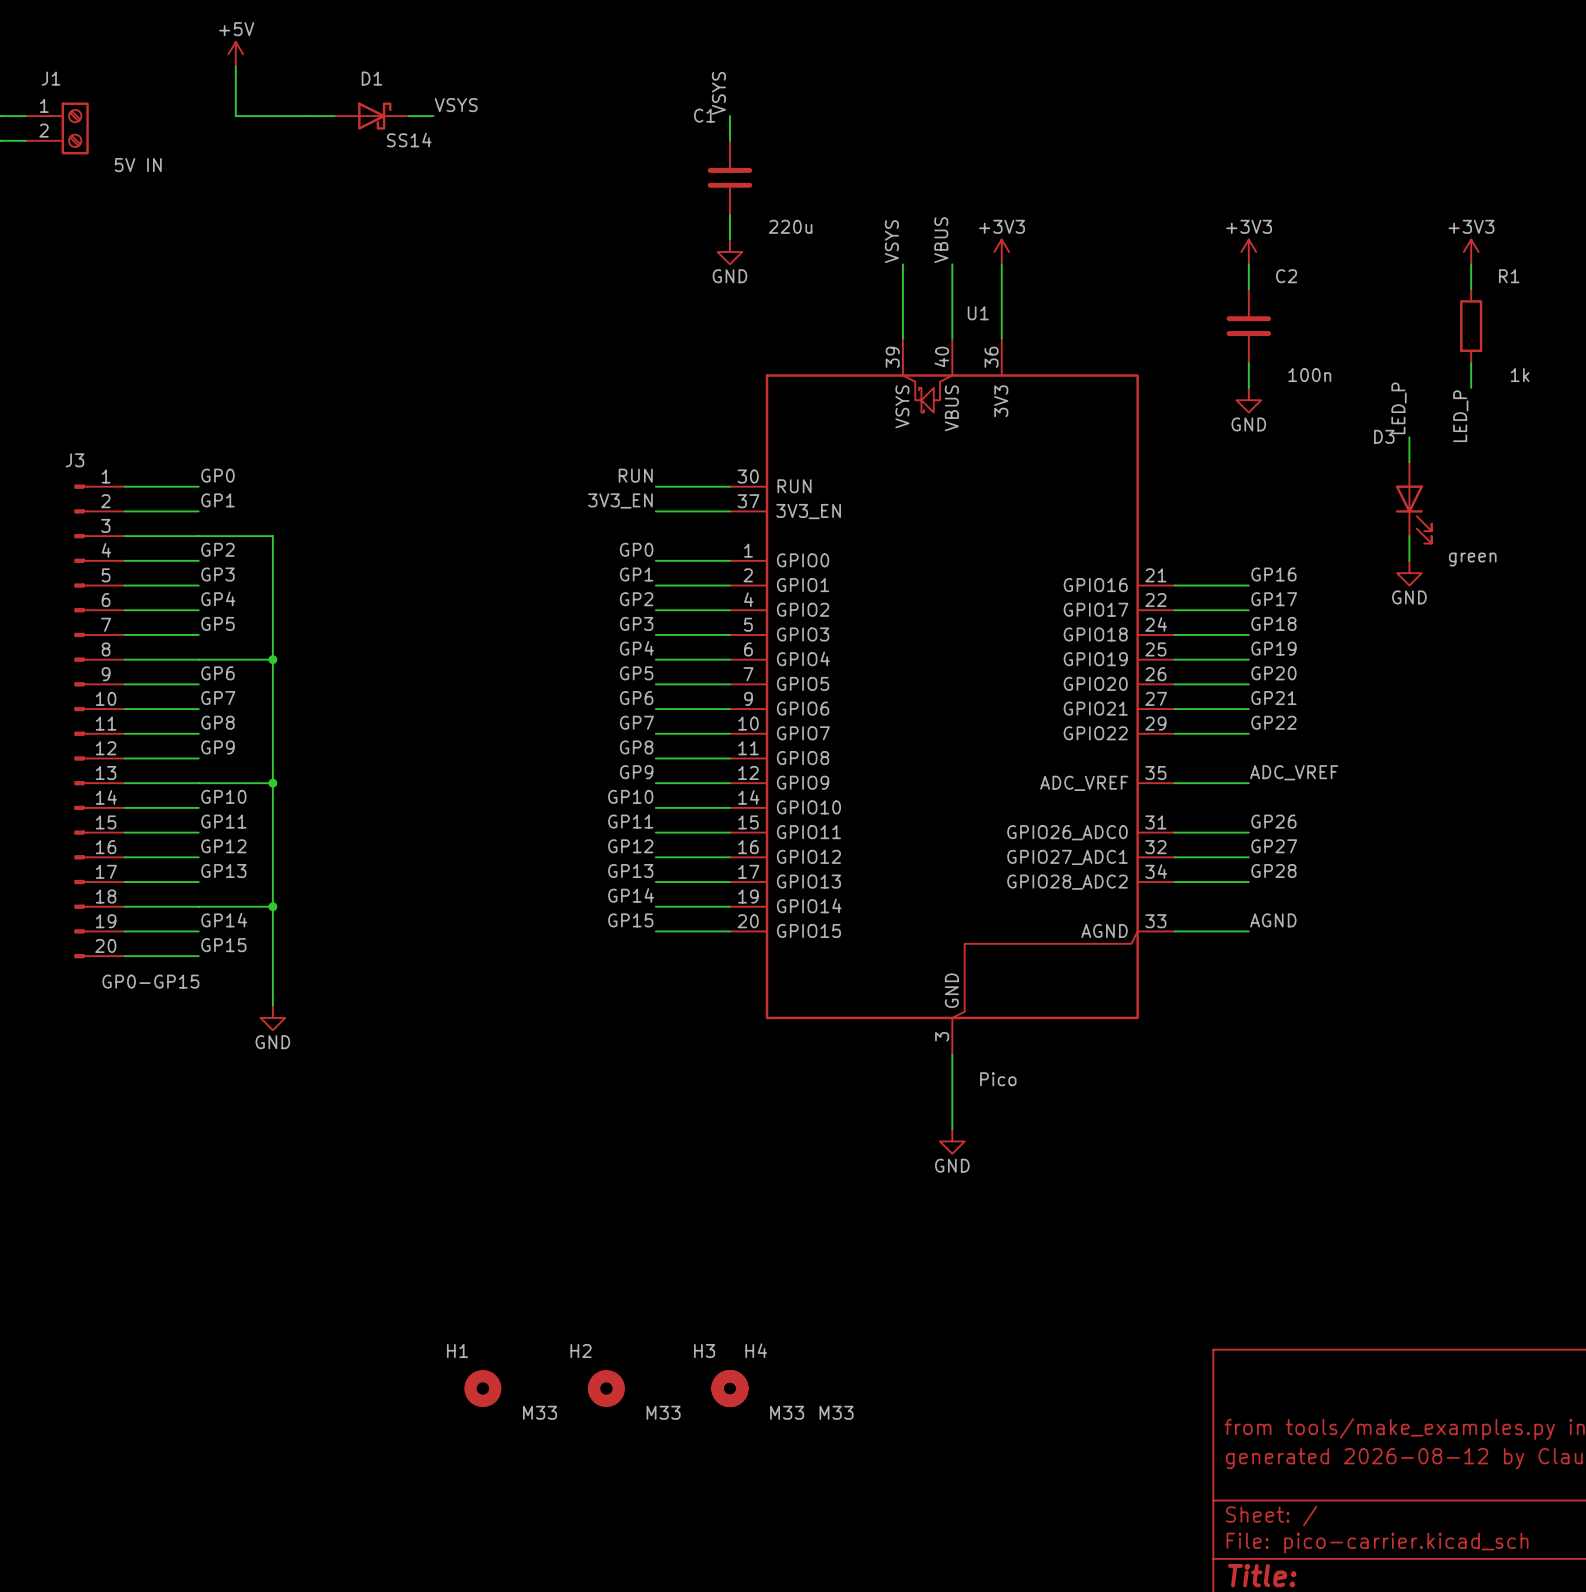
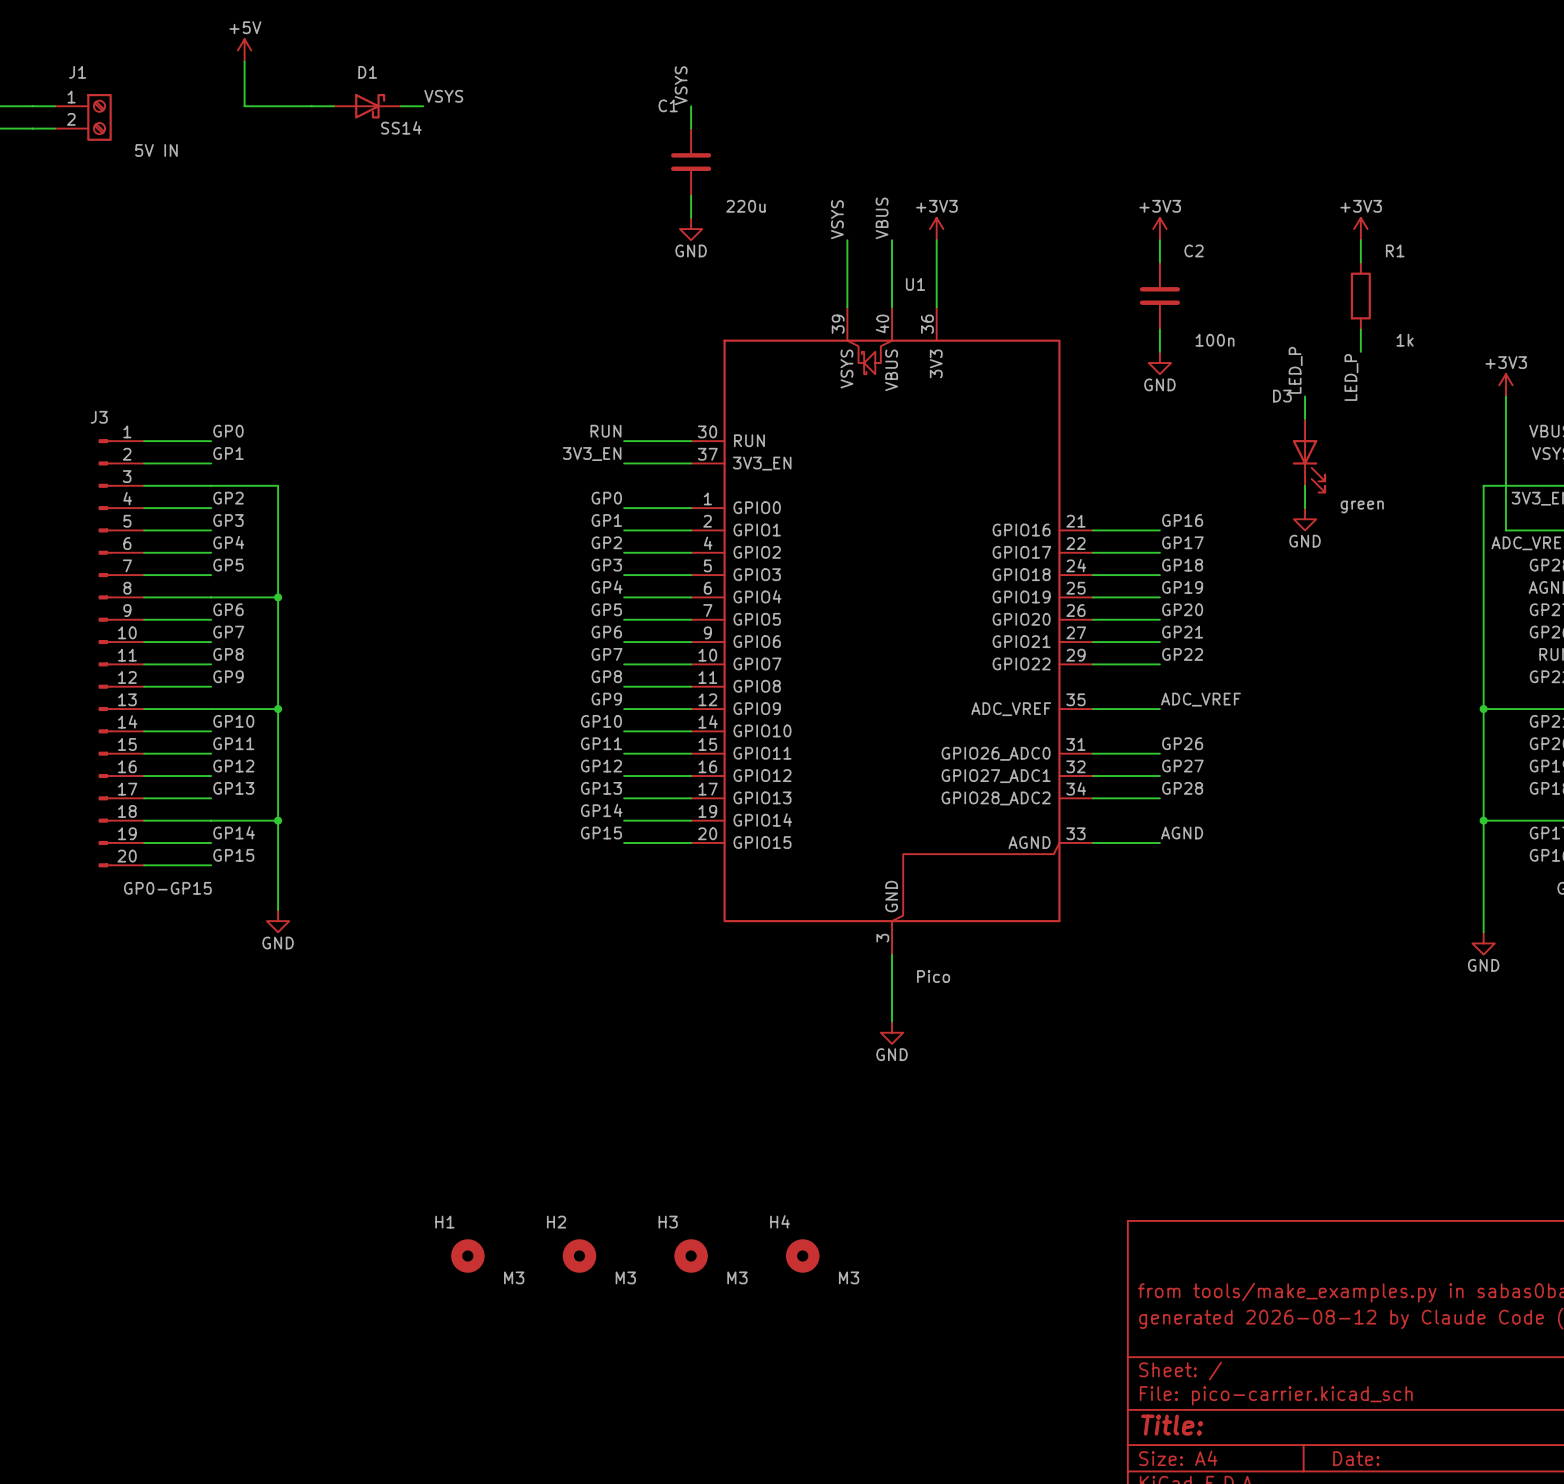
H4 name position: H4 (756, 1350) -> H4 (780, 1221)
H4 position: (729, 1388) -> (802, 1256)
H1 value: M33 (540, 1412) -> M3 (514, 1277)
H2 value: M33 (663, 1412) -> M3 (625, 1277)
H3 value: M33 (787, 1412) -> M3 (737, 1277)
H4 value: M33 (836, 1412) -> M3 (849, 1277)

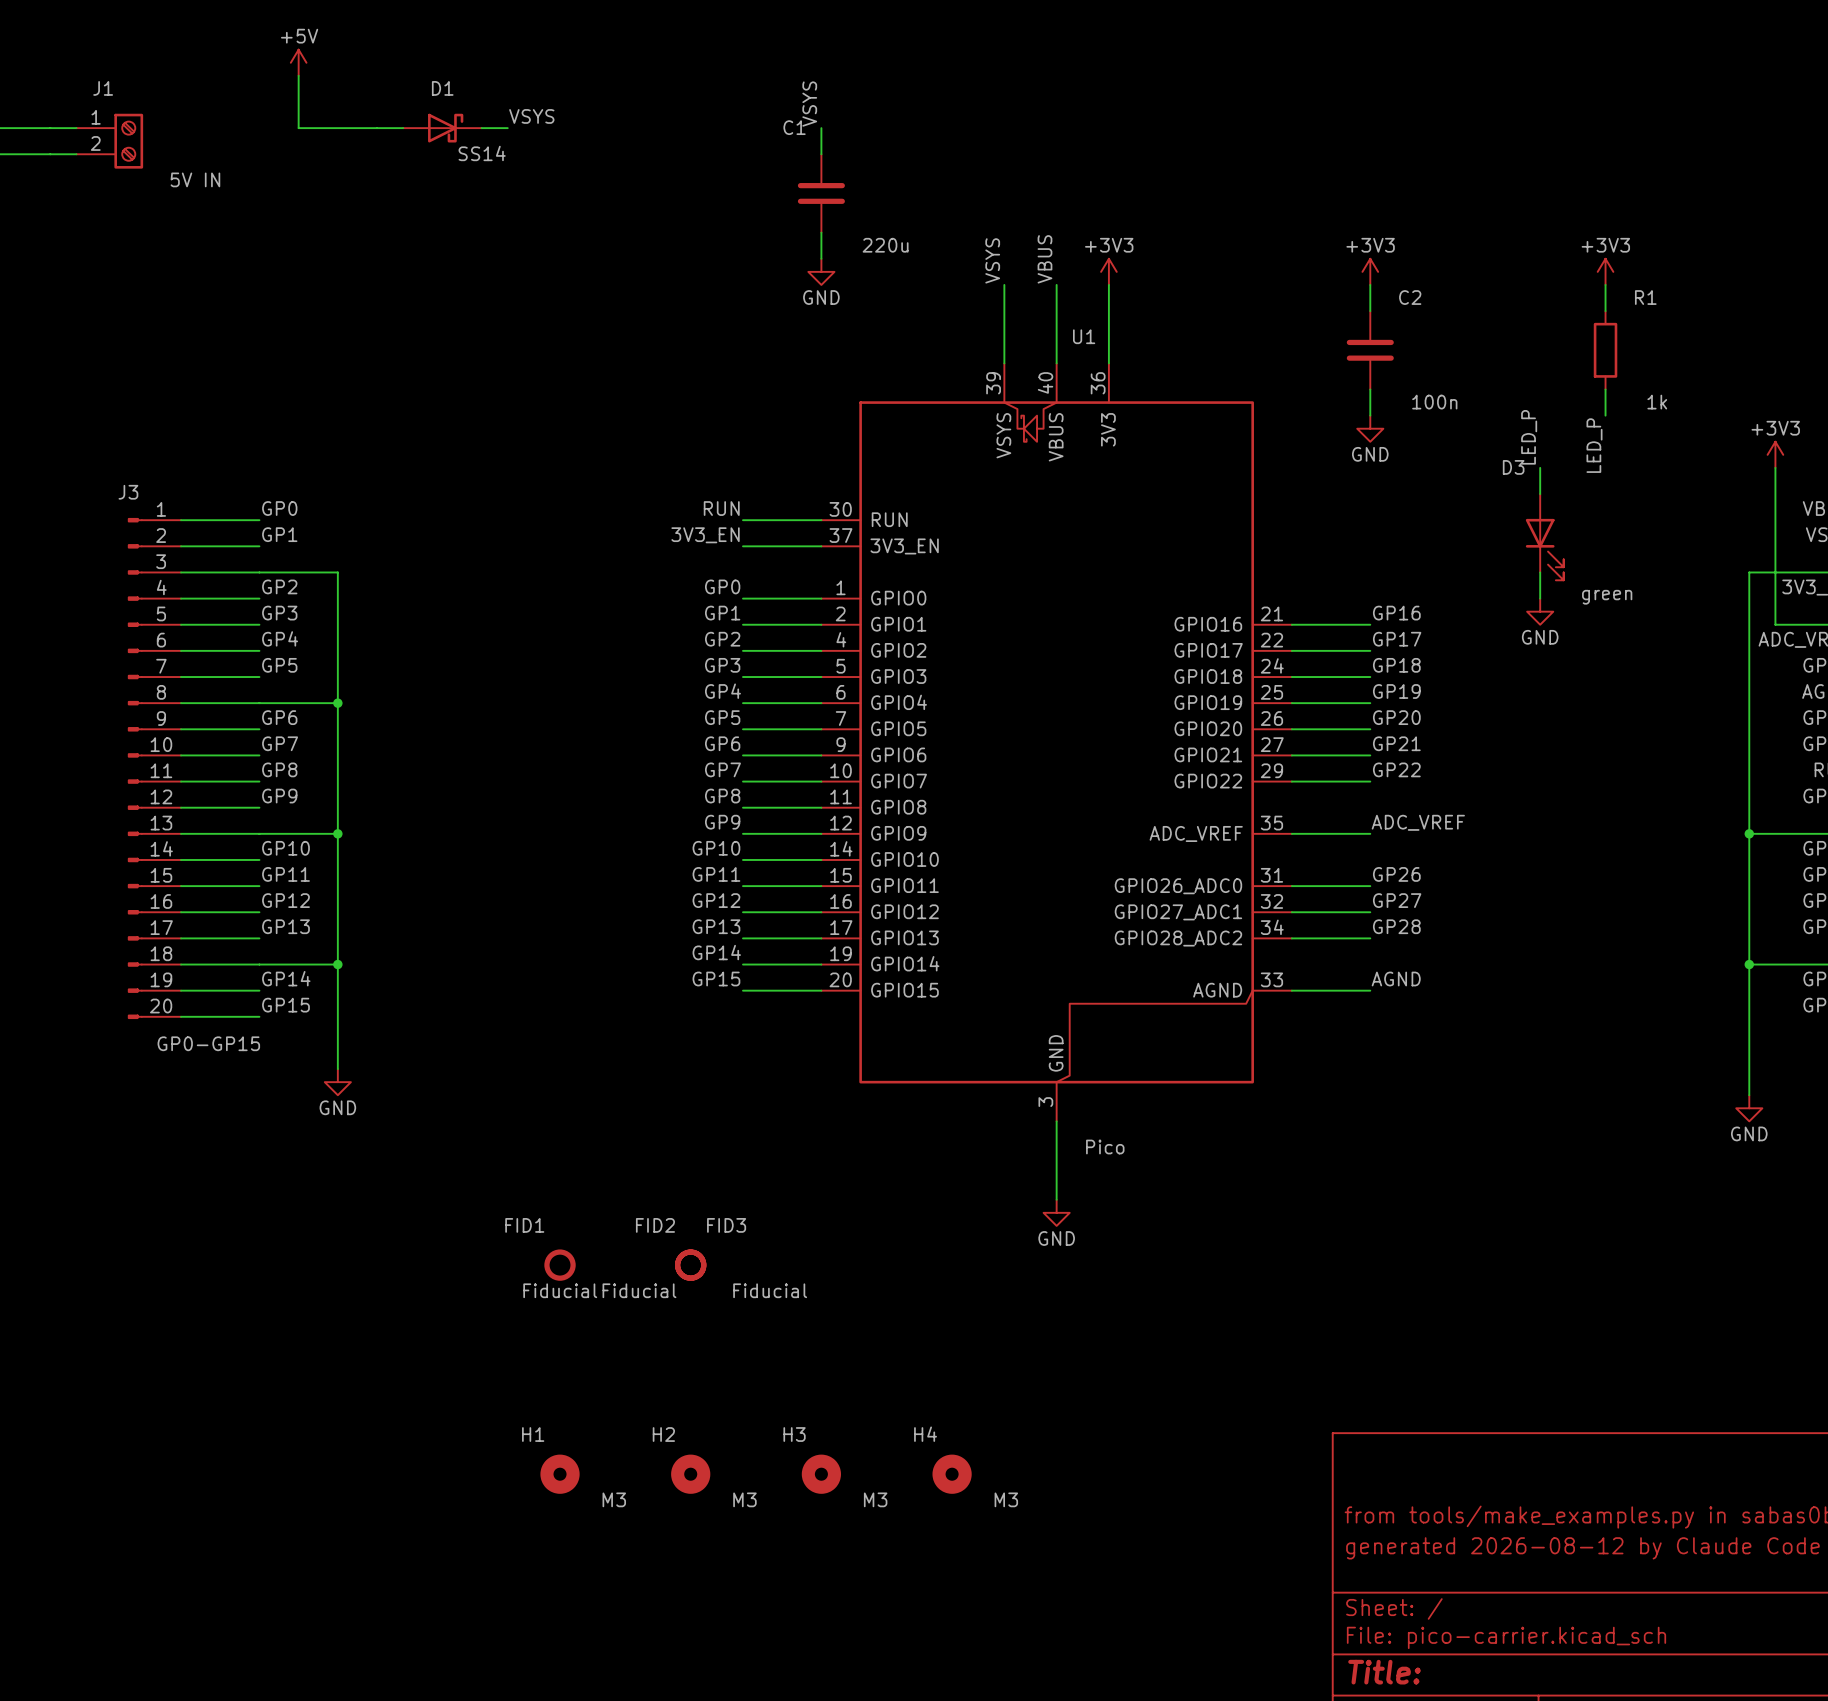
FID1: none -> Fiducial (560, 1265)
FID2: none -> Fiducial (690, 1265)
FID3: none -> Fiducial (690, 1265)

